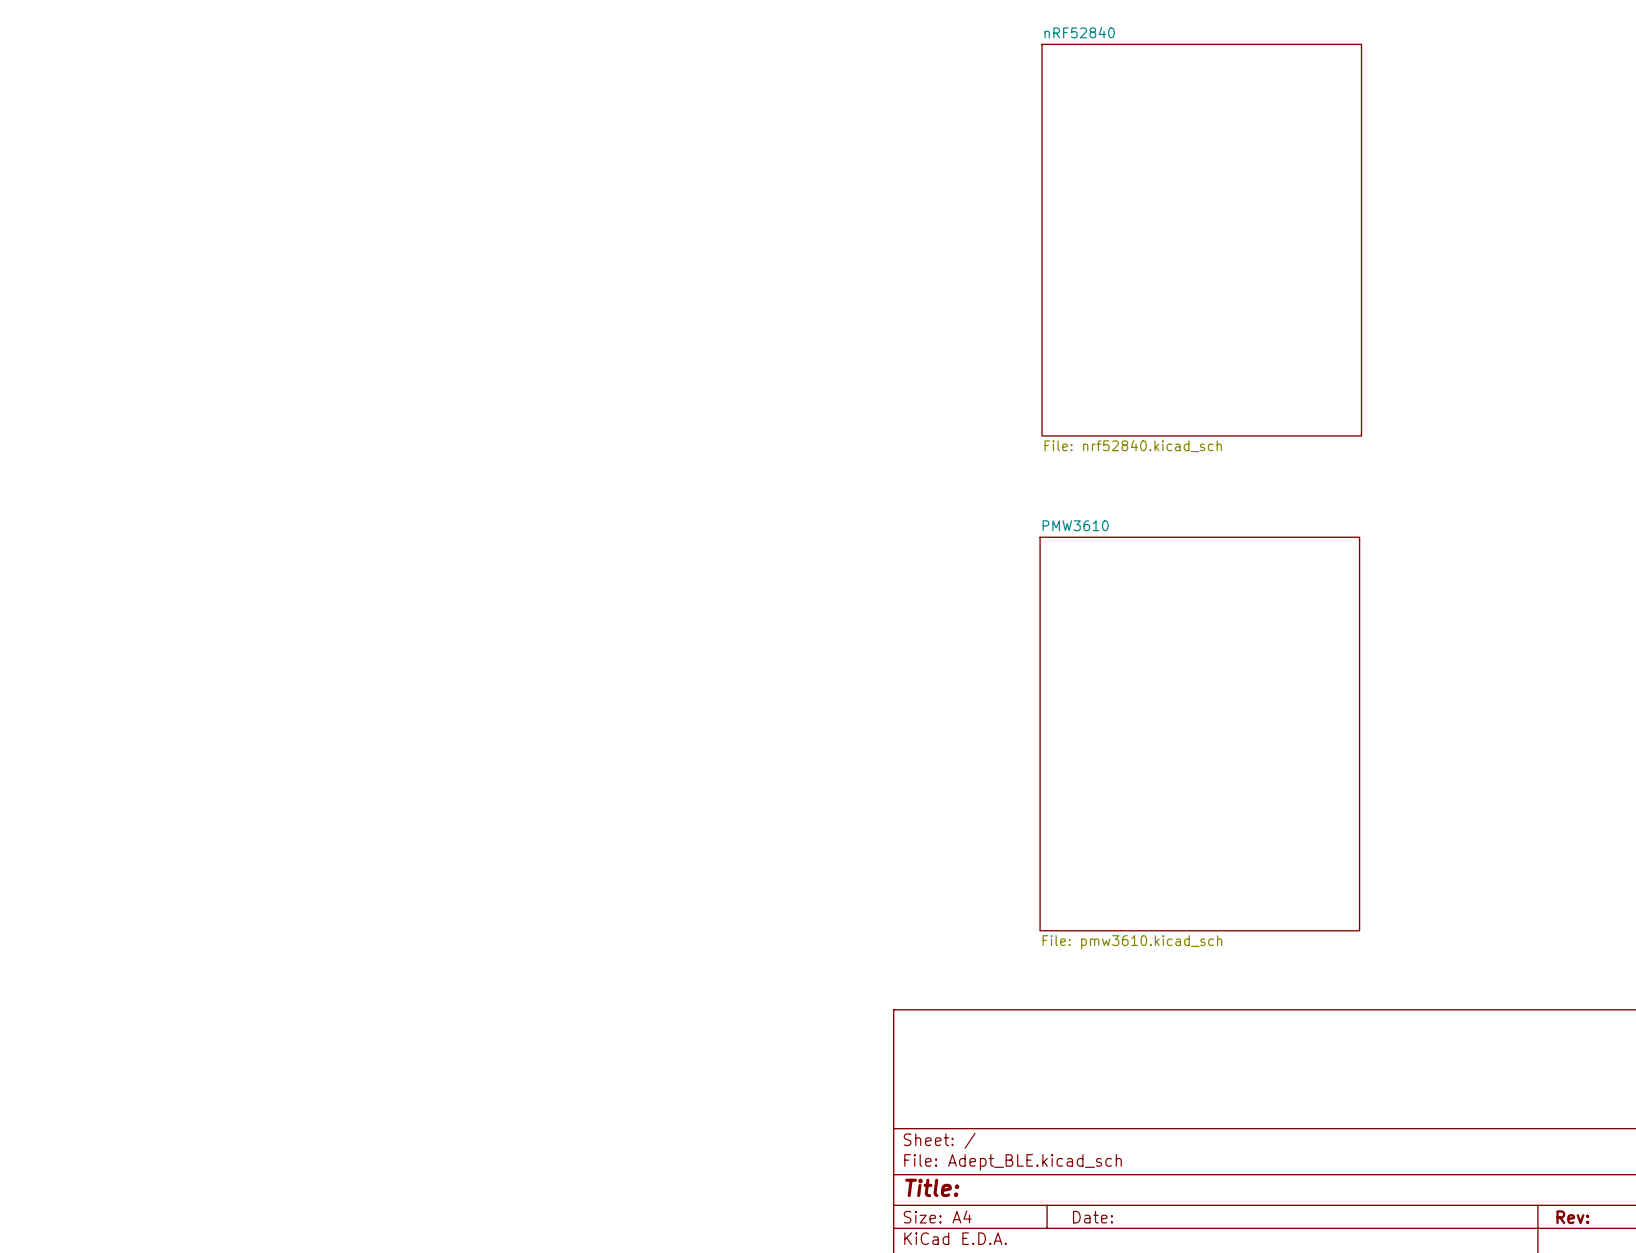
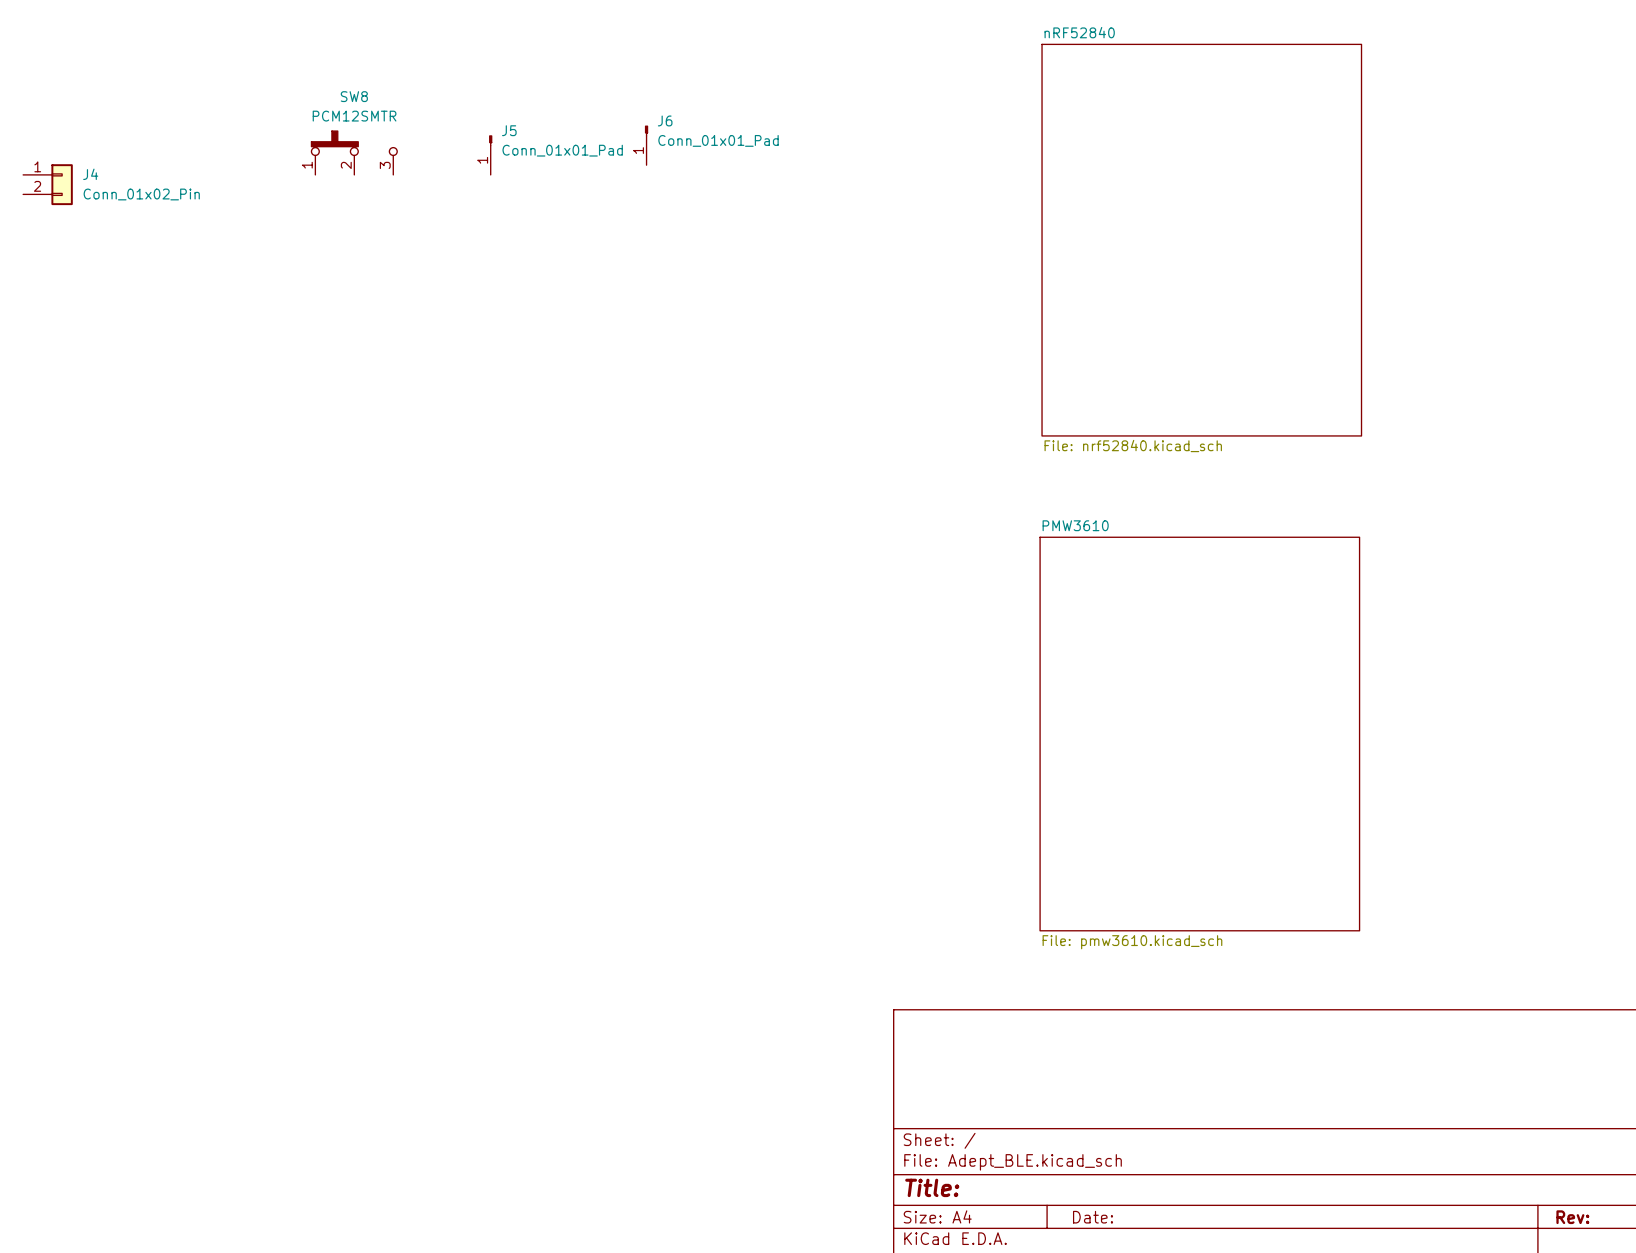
J6: none -> Conn_01x01_Pad (646, 145)
SW8: none -> PCM12SMTR (354, 152)
J5: none -> Conn_01x01_Pad (490, 155)
J4: none -> Conn_01x02_Pin (47, 184)

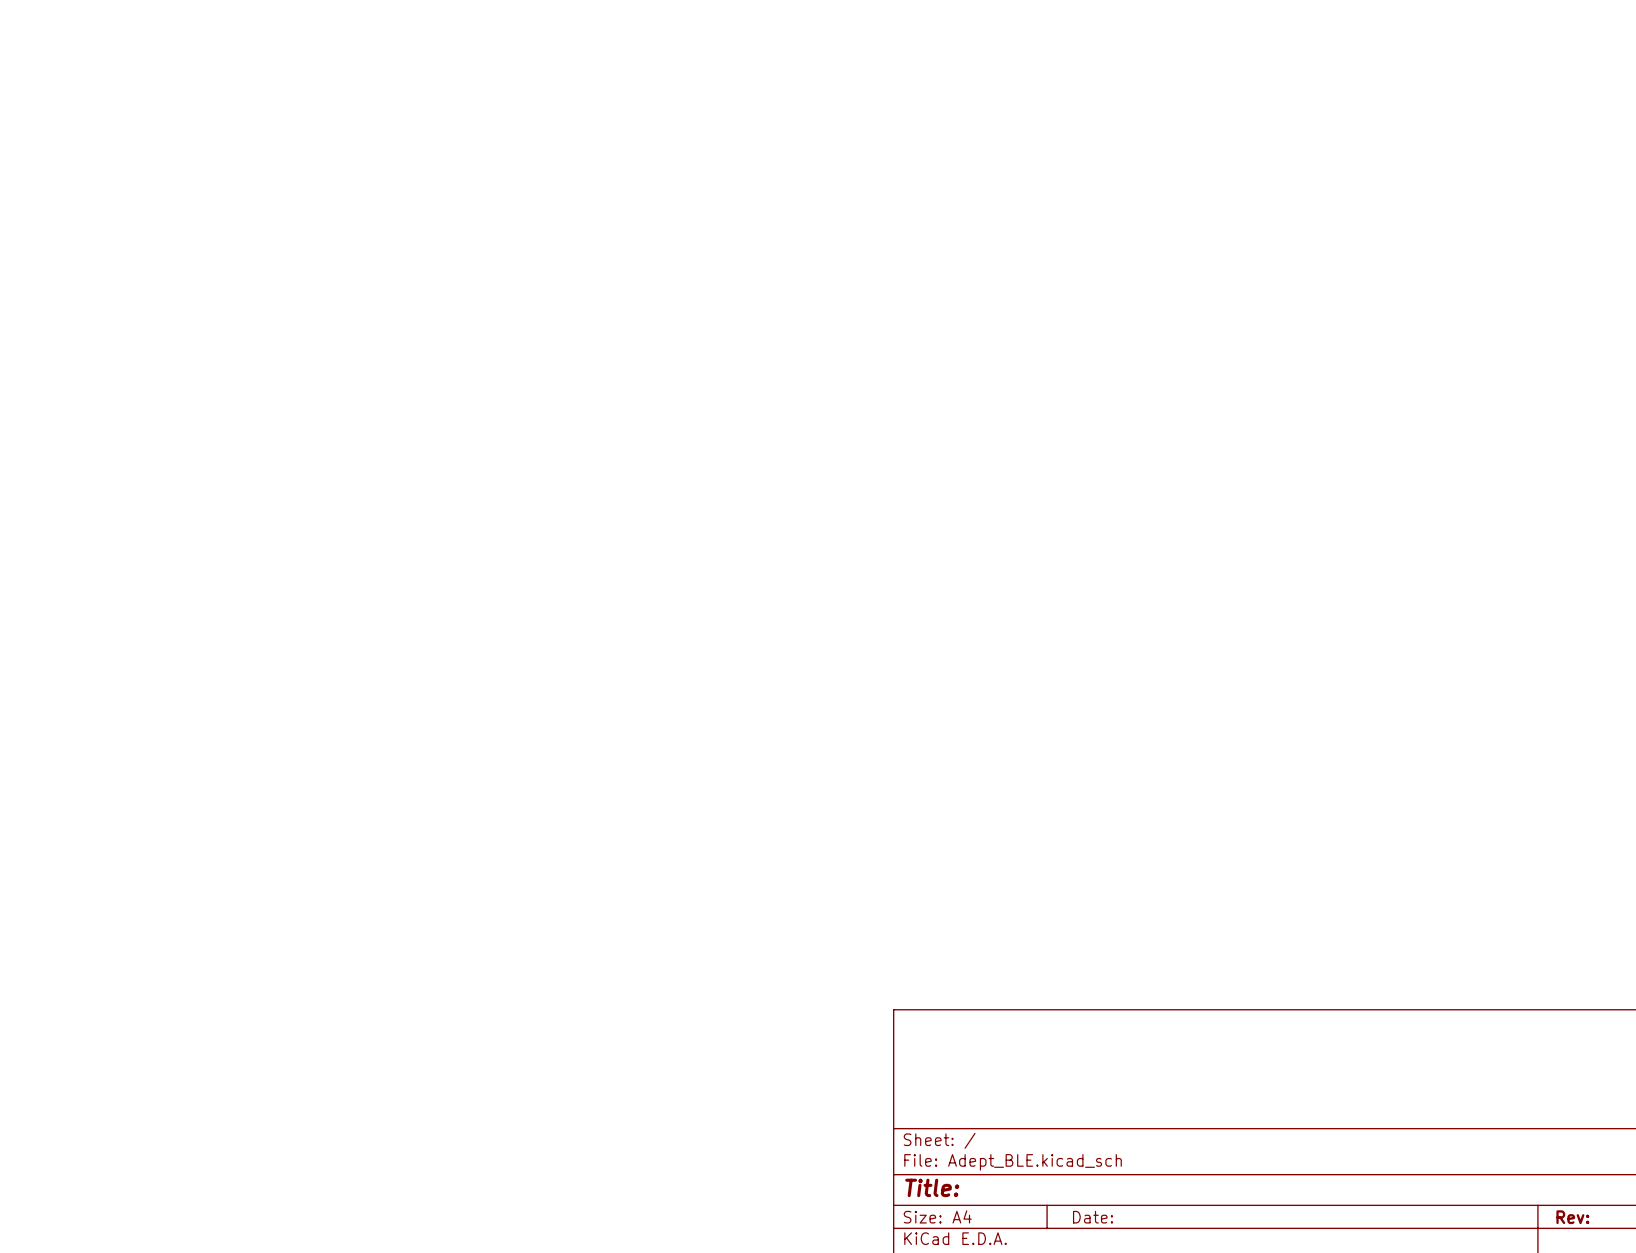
J6: Conn_01x01_Pad (646, 145) -> none
SW8: PCM12SMTR (354, 152) -> none
J5: Conn_01x01_Pad (490, 155) -> none
J4: Conn_01x02_Pin (47, 184) -> none
sheet nRF52840: File: nrf52840.kicad_sch (1201, 240) -> none
sheet PMW3610: File: pmw3610.kicad_sch (1199, 734) -> none

